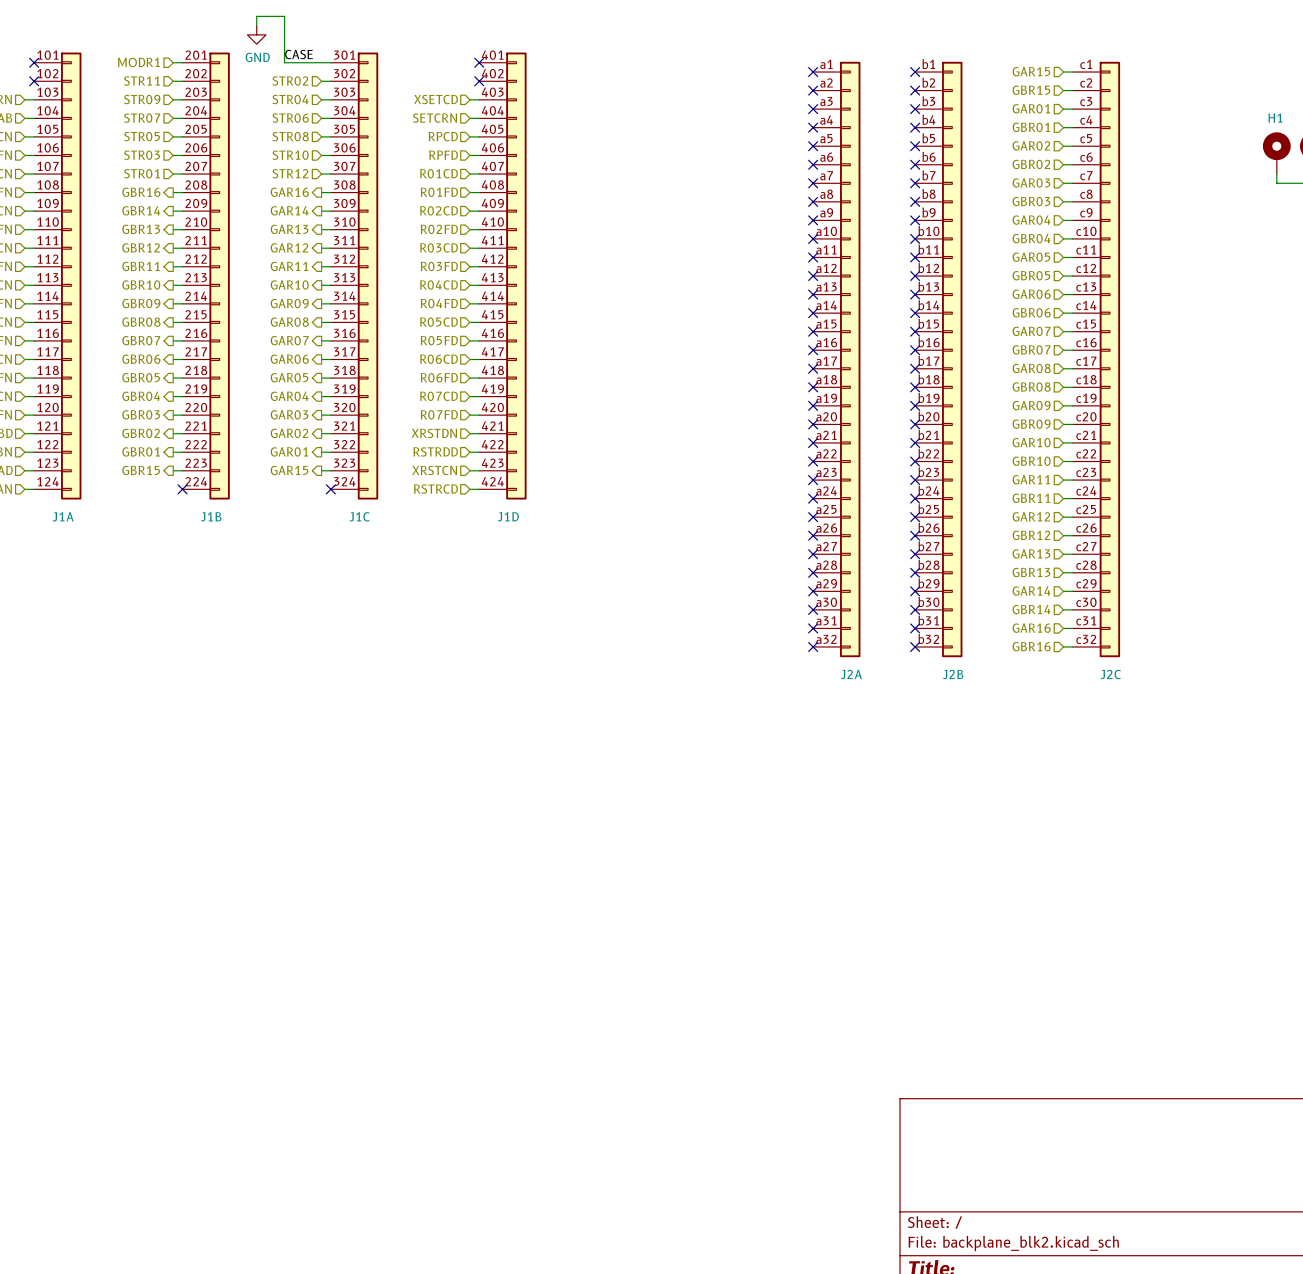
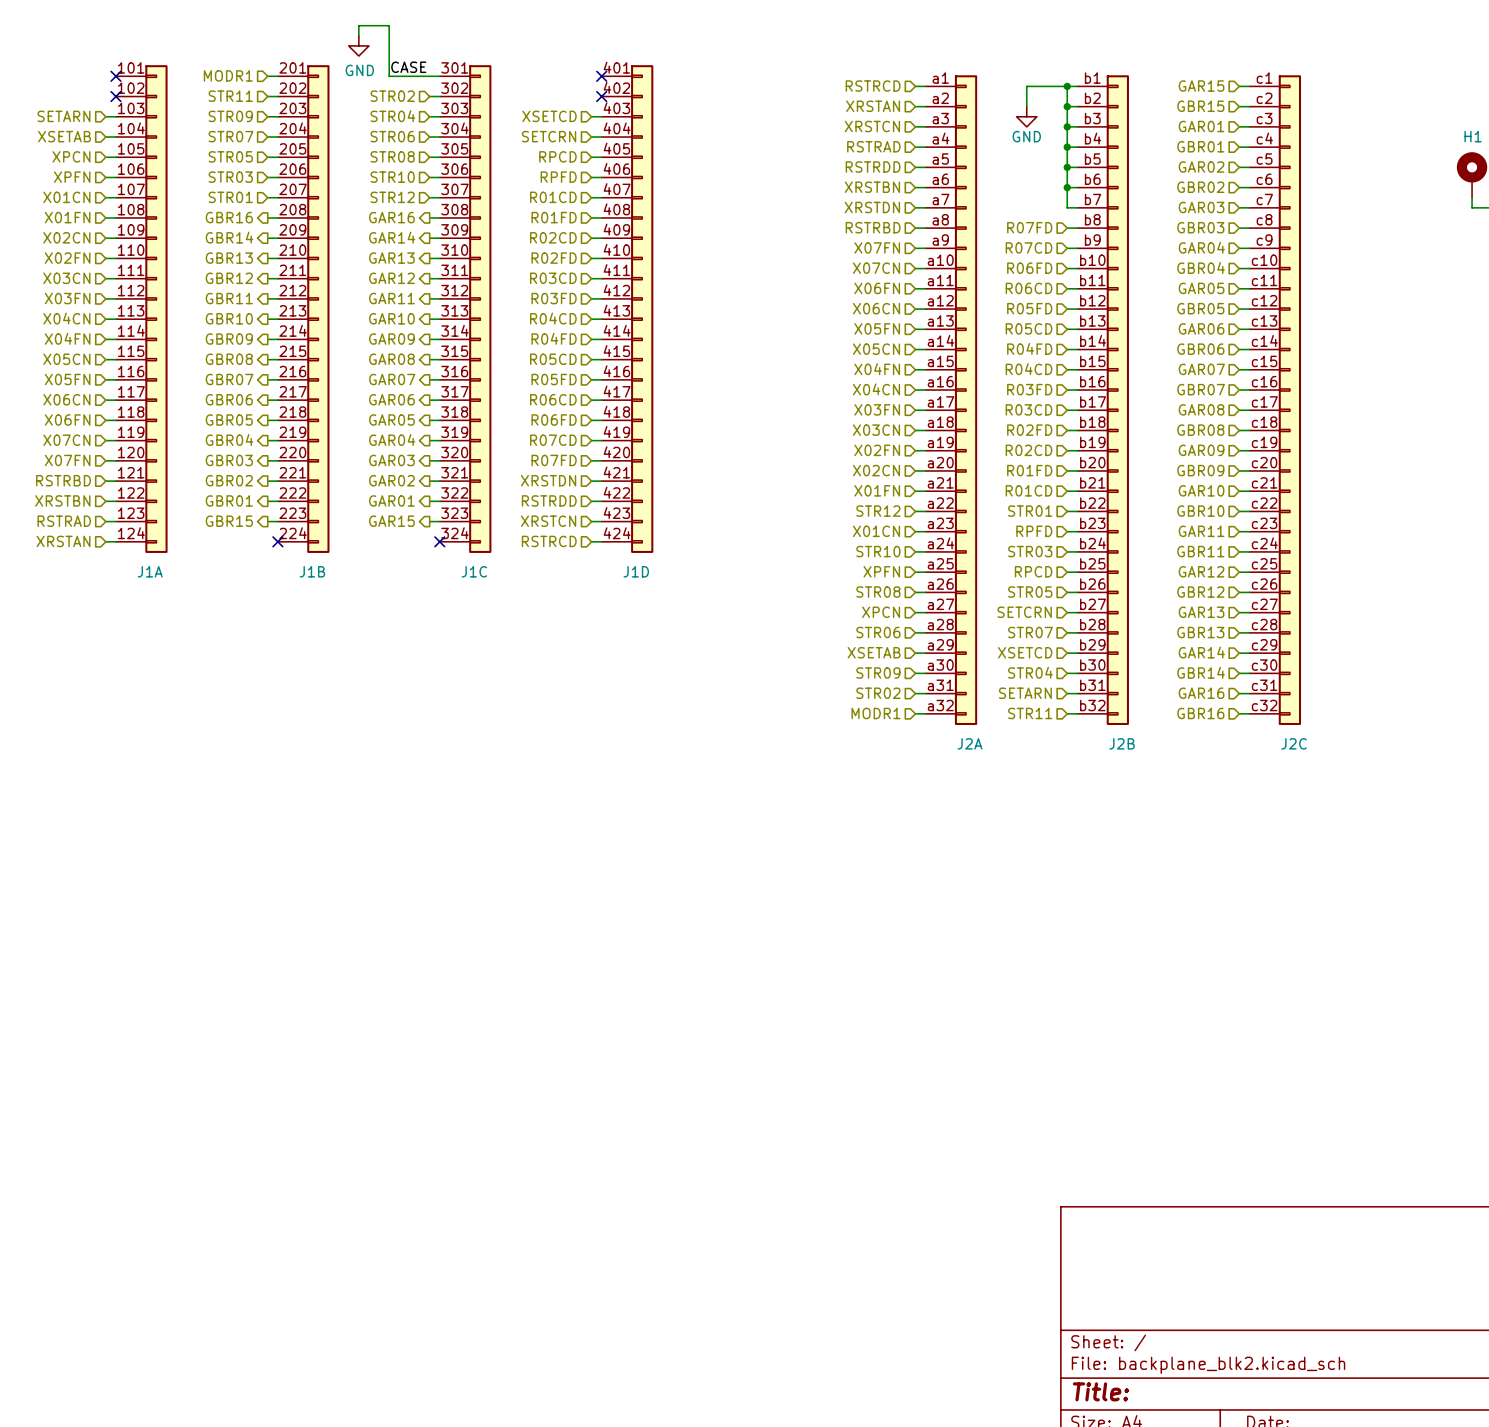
hierarchical label: none -> RSTRCD (873, 86)
wire: none -> (915, 86) (925, 86)
no-connect mark: (813, 72) -> none
wire: none -> (1067, 86) (1067, 207) (1077, 207)
junction: none -> (1067, 86)
wire: none -> (1077, 86) (1026, 86) (1026, 106)
no-connect mark: (915, 72) -> none
hierarchical label: none -> XRSTAN (873, 106)
wire: none -> (915, 106) (925, 106)
no-connect mark: (813, 90) -> none
wire: none -> (1067, 106) (1077, 106)
junction: none -> (1067, 106)
no-connect mark: (915, 90) -> none
power symbol: none -> GND (1026, 116)
hierarchical label: none -> XRSTCN (872, 126)
wire: none -> (915, 126) (925, 126)
no-connect mark: (813, 109) -> none
wire: none -> (1067, 126) (1077, 126)
junction: none -> (1067, 126)
no-connect mark: (915, 109) -> none
hierarchical label: none -> RSTRAD (873, 146)
wire: none -> (915, 147) (925, 147)
no-connect mark: (813, 127) -> none
wire: none -> (1067, 147) (1077, 147)
junction: none -> (1067, 147)
no-connect mark: (915, 127) -> none
hierarchical label: none -> RSTRDD (873, 166)
wire: none -> (915, 167) (925, 167)
no-connect mark: (813, 146) -> none
wire: none -> (1067, 167) (1077, 167)
junction: none -> (1067, 167)
no-connect mark: (915, 146) -> none
hierarchical label: none -> XRSTBN (872, 187)
wire: none -> (915, 187) (925, 187)
no-connect mark: (813, 164) -> none
wire: none -> (1067, 187) (1077, 187)
junction: none -> (1067, 187)
no-connect mark: (915, 164) -> none
hierarchical label: none -> XRSTDN (872, 207)
wire: none -> (915, 207) (925, 207)
no-connect mark: (813, 183) -> none
no-connect mark: (915, 183) -> none
hierarchical label: none -> RSTRBD (873, 227)
wire: none -> (915, 228) (925, 228)
no-connect mark: (813, 201) -> none
hierarchical label: none -> R07FD (1029, 227)
wire: none -> (1067, 228) (1077, 228)
no-connect mark: (915, 201) -> none
hierarchical label: none -> X07FN (877, 247)
wire: none -> (915, 248) (925, 248)
no-connect mark: (813, 220) -> none
hierarchical label: none -> R07CD (1029, 247)
wire: none -> (1067, 248) (1077, 248)
no-connect mark: (915, 220) -> none
hierarchical label: none -> X07CN (876, 268)
wire: none -> (915, 268) (925, 268)
no-connect mark: (813, 238) -> none
hierarchical label: none -> R06FD (1029, 268)
wire: none -> (1067, 268) (1077, 268)
no-connect mark: (915, 238) -> none
hierarchical label: none -> X06FN (877, 288)
wire: none -> (915, 288) (925, 288)
no-connect mark: (813, 257) -> none
hierarchical label: none -> R06CD (1029, 288)
wire: none -> (1067, 288) (1077, 288)
no-connect mark: (915, 257) -> none
hierarchical label: none -> X06CN (876, 308)
hierarchical label: none -> R05FD (1029, 308)
wire: none -> (915, 309) (925, 309)
no-connect mark: (813, 276) -> none
wire: none -> (1067, 309) (1077, 309)
no-connect mark: (915, 276) -> none
hierarchical label: none -> X05FN (877, 328)
wire: none -> (915, 329) (925, 329)
no-connect mark: (813, 294) -> none
hierarchical label: none -> R05CD (1029, 328)
wire: none -> (1067, 329) (1077, 329)
no-connect mark: (915, 294) -> none
hierarchical label: none -> X05CN (876, 349)
hierarchical label: none -> R04FD (1029, 348)
wire: none -> (915, 349) (925, 349)
no-connect mark: (813, 313) -> none
wire: none -> (1067, 349) (1077, 349)
no-connect mark: (915, 313) -> none
hierarchical label: none -> X04FN (877, 369)
wire: none -> (915, 369) (925, 369)
no-connect mark: (813, 331) -> none
hierarchical label: none -> R04CD (1029, 369)
wire: none -> (1067, 369) (1077, 369)
no-connect mark: (915, 331) -> none
hierarchical label: none -> X04CN (876, 389)
hierarchical label: none -> R03FD (1029, 389)
wire: none -> (915, 390) (925, 390)
no-connect mark: (813, 350) -> none
wire: none -> (1067, 390) (1077, 390)
no-connect mark: (915, 350) -> none
J2A position: (836, 359) -> (951, 400)
hierarchical label: none -> X03FN (877, 409)
wire: none -> (915, 410) (925, 410)
no-connect mark: (813, 368) -> none
hierarchical label: none -> R03CD (1029, 409)
wire: none -> (1067, 410) (1077, 410)
no-connect mark: (915, 368) -> none
hierarchical label: none -> X03CN (876, 430)
wire: none -> (915, 430) (925, 430)
no-connect mark: (813, 387) -> none
hierarchical label: none -> R02FD (1029, 430)
wire: none -> (1067, 430) (1077, 430)
no-connect mark: (915, 387) -> none
hierarchical label: none -> X02FN (877, 450)
wire: none -> (915, 450) (925, 450)
no-connect mark: (813, 405) -> none
hierarchical label: none -> R02CD (1029, 450)
wire: none -> (1067, 450) (1077, 450)
no-connect mark: (915, 405) -> none
hierarchical label: none -> X02CN (876, 470)
wire: none -> (915, 470) (925, 470)
no-connect mark: (813, 424) -> none
hierarchical label: none -> R01FD (1029, 470)
wire: none -> (1067, 470) (1077, 470)
no-connect mark: (915, 424) -> none
hierarchical label: none -> X01FN (877, 490)
wire: none -> (915, 491) (925, 491)
no-connect mark: (813, 442) -> none
hierarchical label: none -> R01CD (1029, 490)
wire: none -> (1067, 491) (1077, 491)
no-connect mark: (915, 442) -> none
hierarchical label: none -> STR12 (878, 511)
wire: none -> (915, 511) (925, 511)
no-connect mark: (813, 461) -> none
hierarchical label: none -> STR01 (1030, 511)
wire: none -> (1067, 511) (1077, 511)
no-connect mark: (915, 461) -> none
hierarchical label: none -> X01CN (876, 531)
hierarchical label: none -> RPFD (1034, 531)
wire: none -> (915, 531) (925, 531)
no-connect mark: (813, 480) -> none
wire: none -> (1067, 531) (1077, 531)
no-connect mark: (915, 480) -> none
hierarchical label: none -> STR10 (878, 551)
wire: none -> (915, 551) (925, 551)
no-connect mark: (813, 498) -> none
hierarchical label: none -> STR03 (1030, 551)
wire: none -> (1067, 551) (1077, 551)
no-connect mark: (915, 498) -> none
hierarchical label: none -> XPFN (881, 571)
hierarchical label: none -> RPCD (1033, 571)
wire: none -> (915, 572) (925, 572)
no-connect mark: (813, 517) -> none
wire: none -> (1067, 572) (1077, 572)
no-connect mark: (915, 517) -> none
hierarchical label: none -> STR08 (878, 592)
wire: none -> (915, 592) (925, 592)
no-connect mark: (813, 535) -> none
hierarchical label: none -> STR05 (1030, 592)
wire: none -> (1067, 592) (1077, 592)
no-connect mark: (915, 535) -> none
hierarchical label: none -> XPCN (881, 612)
hierarchical label: none -> SETCRN (1024, 612)
wire: none -> (915, 612) (925, 612)
no-connect mark: (813, 554) -> none
wire: none -> (1067, 612) (1077, 612)
no-connect mark: (915, 554) -> none
hierarchical label: none -> STR06 (878, 632)
wire: none -> (915, 632) (925, 632)
no-connect mark: (813, 572) -> none
hierarchical label: none -> STR07 (1030, 632)
wire: none -> (1067, 632) (1077, 632)
no-connect mark: (915, 572) -> none
hierarchical label: none -> XSETAB (874, 652)
wire: none -> (915, 653) (925, 653)
no-connect mark: (813, 591) -> none
hierarchical label: none -> XSETCD (1025, 652)
wire: none -> (1067, 653) (1077, 653)
no-connect mark: (915, 591) -> none
hierarchical label: none -> STR09 (878, 673)
wire: none -> (915, 673) (925, 673)
no-connect mark: (813, 609) -> none
hierarchical label: none -> STR04 (1030, 672)
wire: none -> (1067, 673) (1077, 673)
no-connect mark: (915, 609) -> none
hierarchical label: none -> STR02 (878, 693)
wire: none -> (915, 693) (925, 693)
no-connect mark: (813, 628) -> none
hierarchical label: none -> SETARN (1025, 693)
wire: none -> (1067, 693) (1077, 693)
no-connect mark: (915, 628) -> none
hierarchical label: none -> MODR1 (876, 713)
wire: none -> (915, 713) (925, 713)
no-connect mark: (813, 646) -> none
hierarchical label: none -> STR11 (1030, 713)
wire: none -> (1067, 713) (1077, 713)
no-connect mark: (915, 646) -> none

